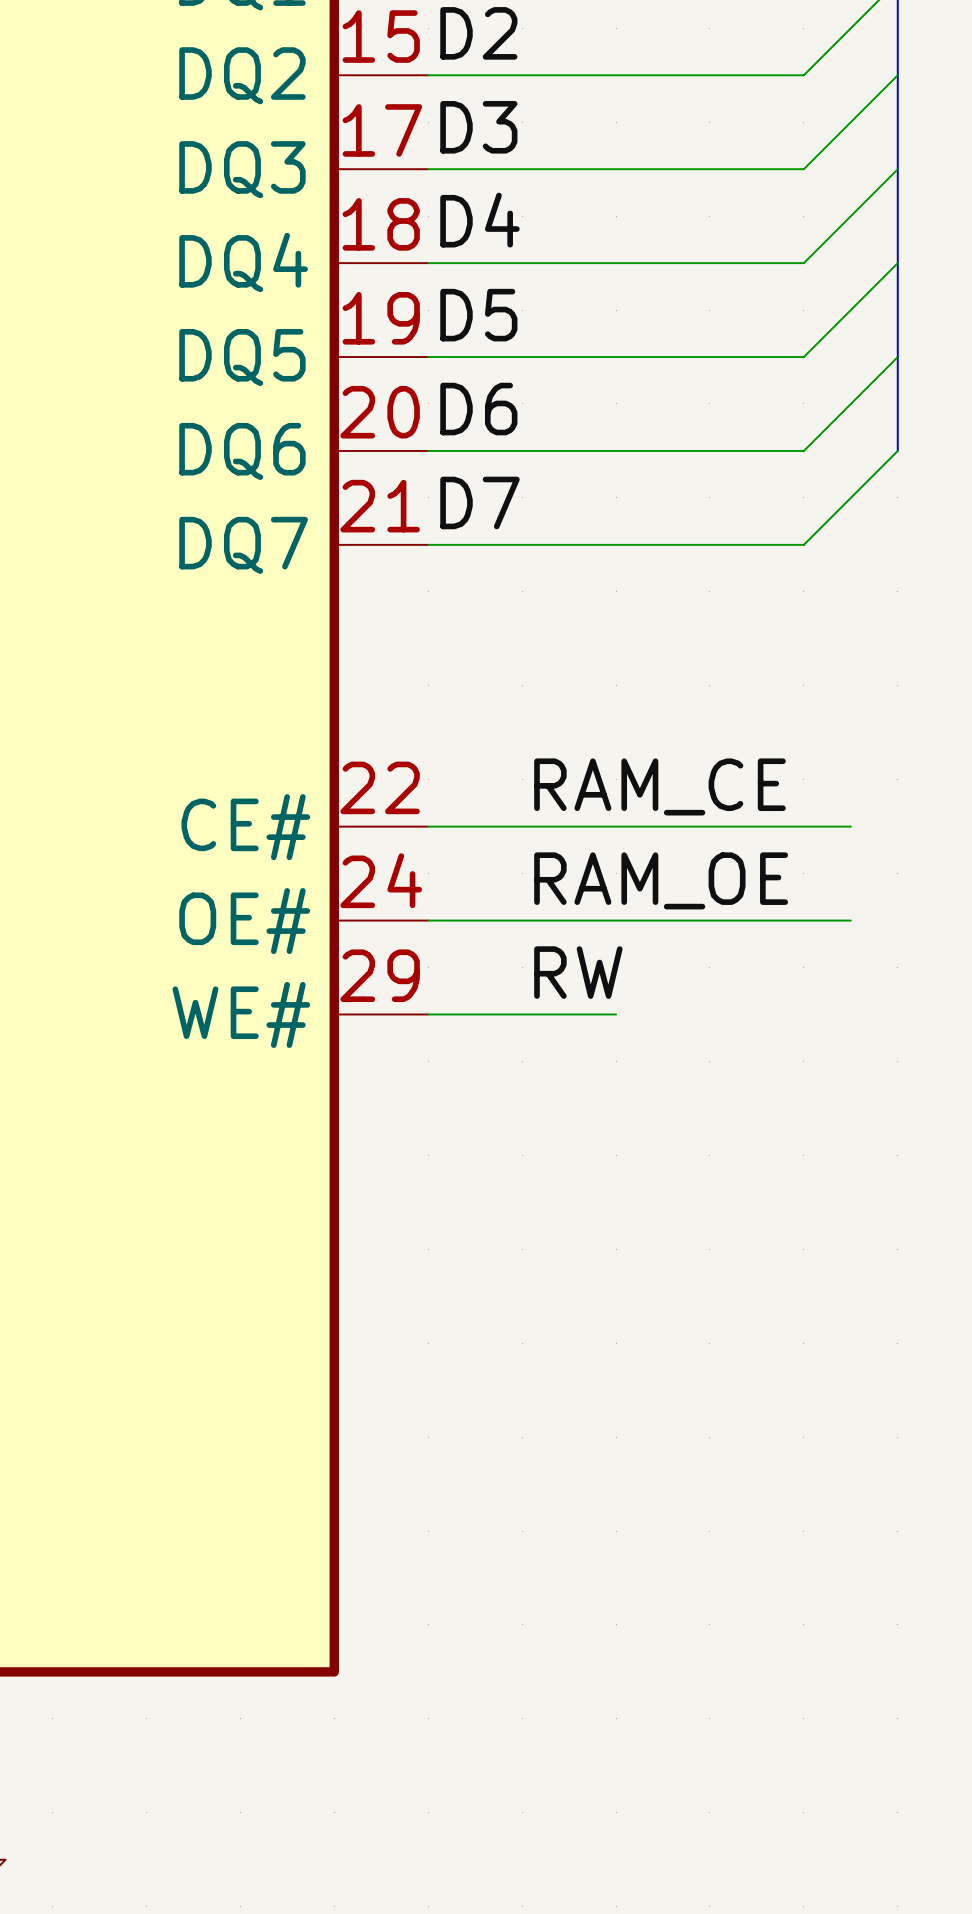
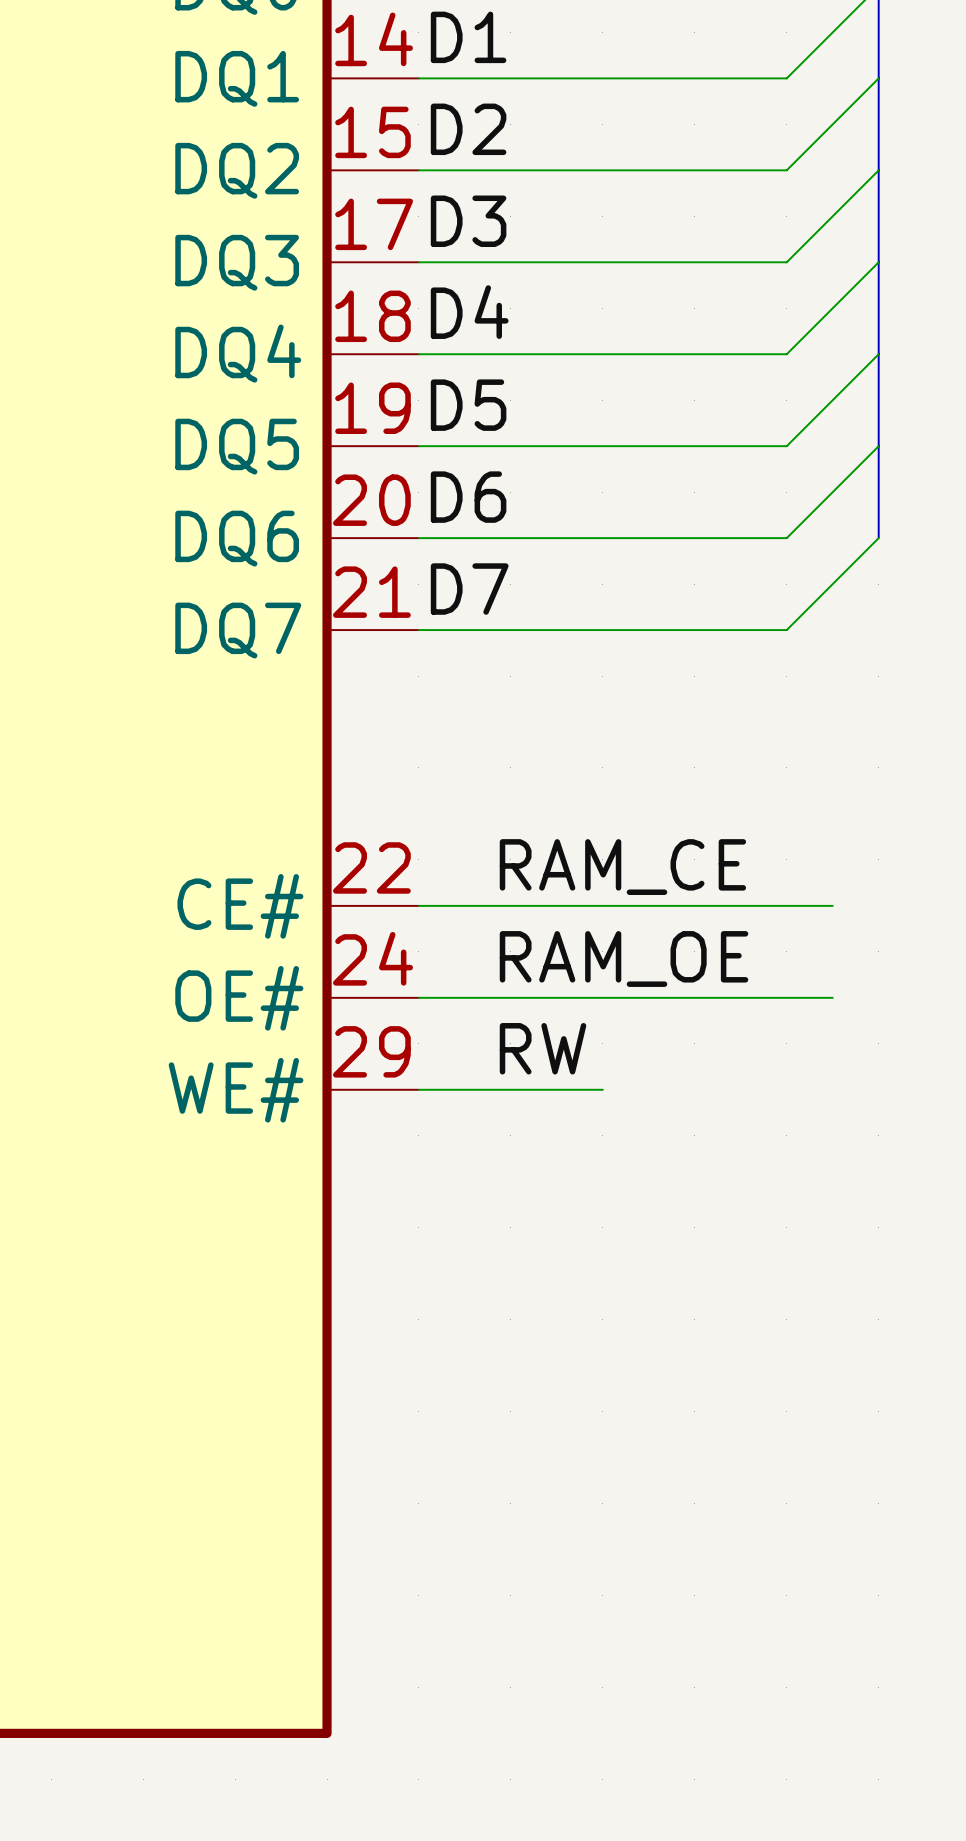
label position: RAM_CE (659, 786) -> RAM_CE (622, 867)
label position: RAM_OE (661, 880) -> RAM_OE (624, 959)
label position: RW (578, 972) -> RW (543, 1048)

